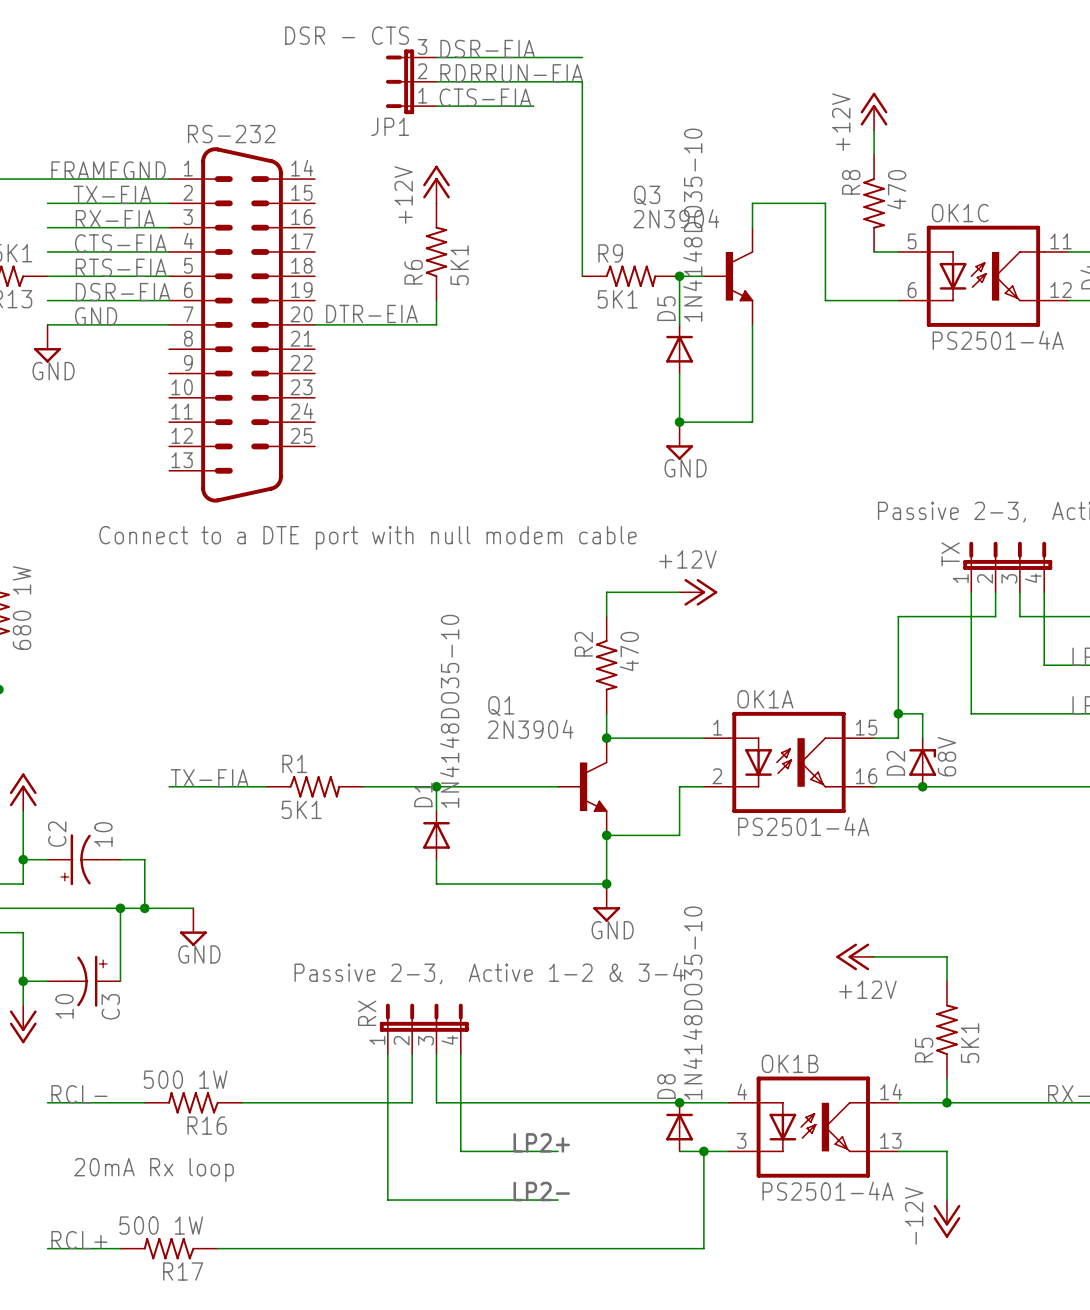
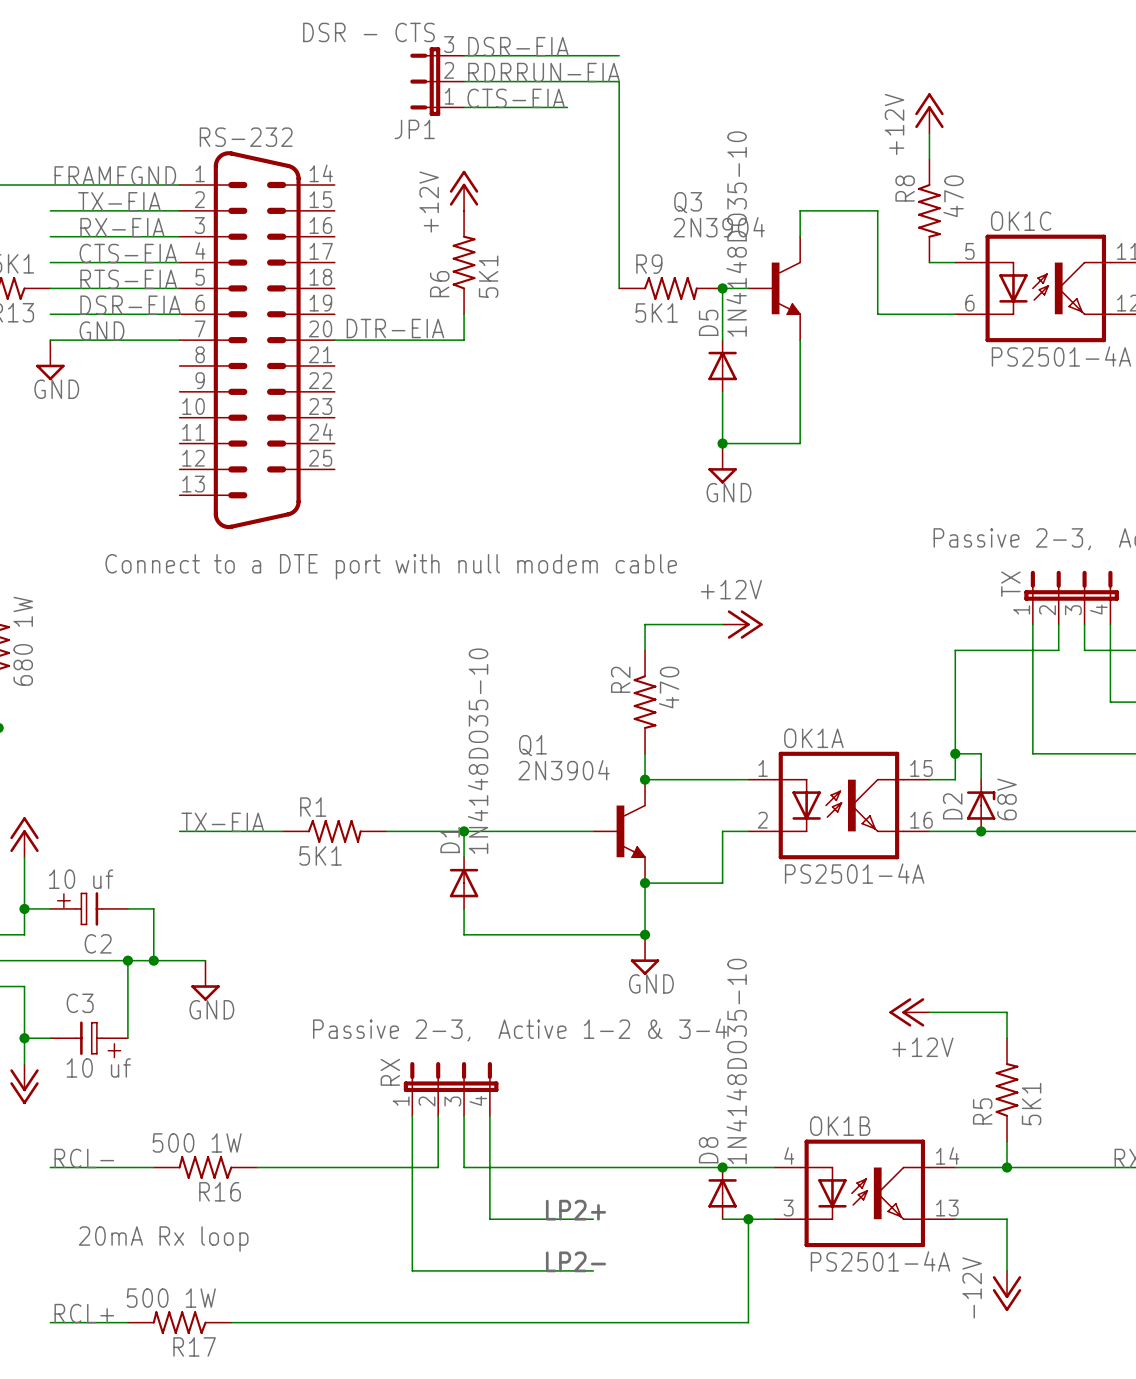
C2 symbol: [47, 834, 121, 886] -> [50, 892, 128, 926]
C2 name position: C2 (57, 834) -> C2 (98, 943)
C2 value: 10 (103, 834) -> 10 uf (81, 879)
C3 symbol: [47, 955, 121, 1007] -> [50, 1021, 128, 1056]
C3 value: 10 (64, 1006) -> 10 uf (98, 1067)
C3 name position: C3 (110, 1006) -> C3 (80, 1003)

